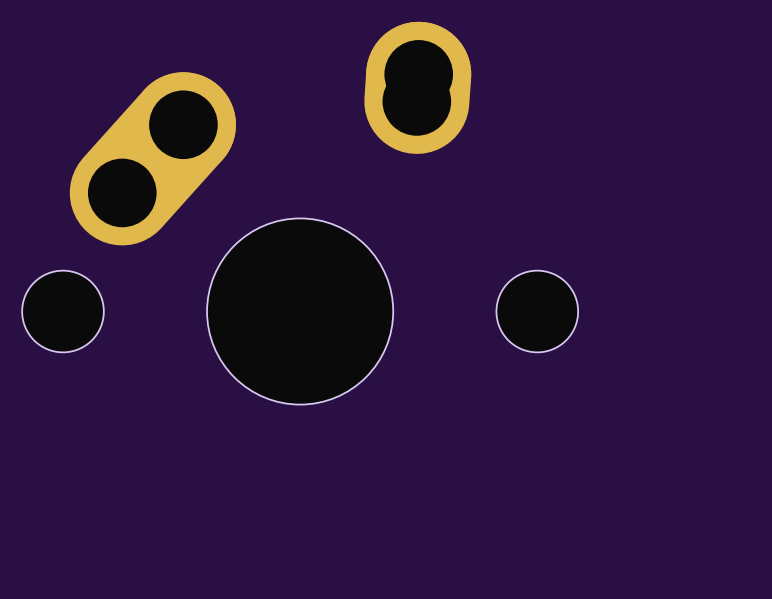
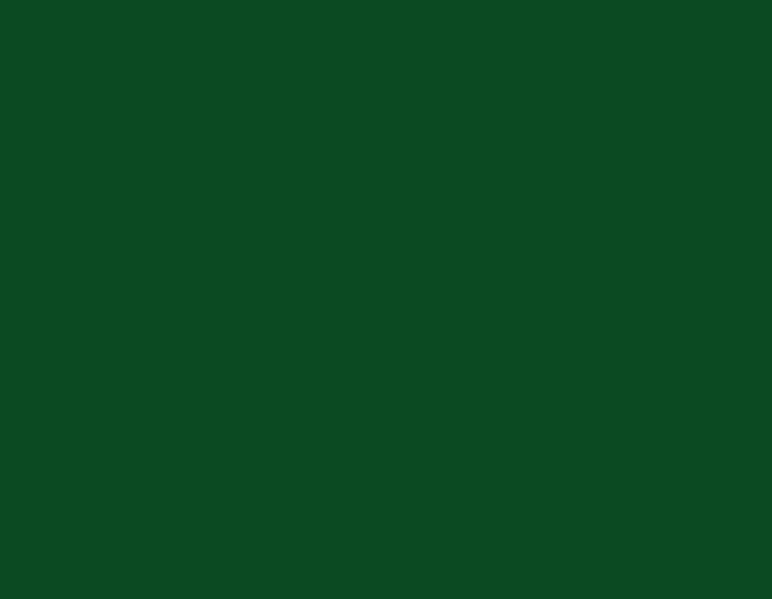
part: (300, 213) -> none

